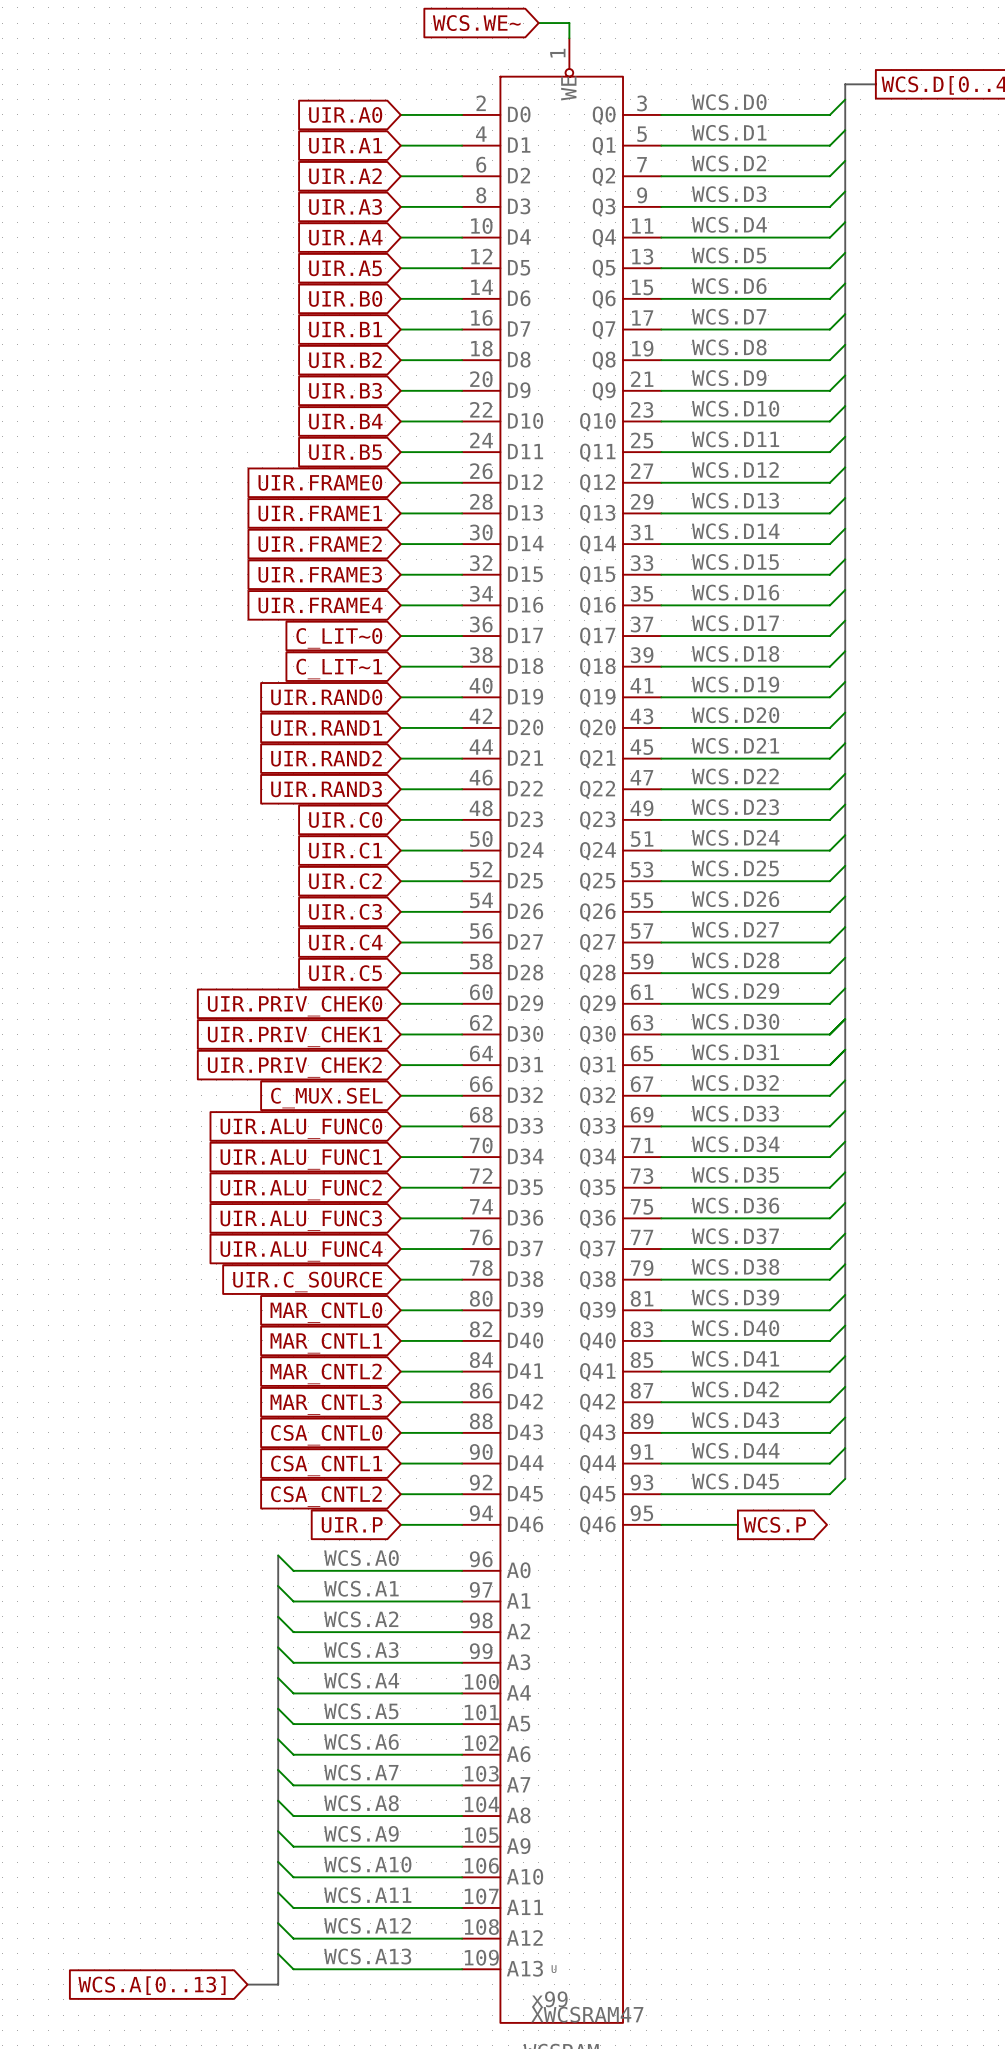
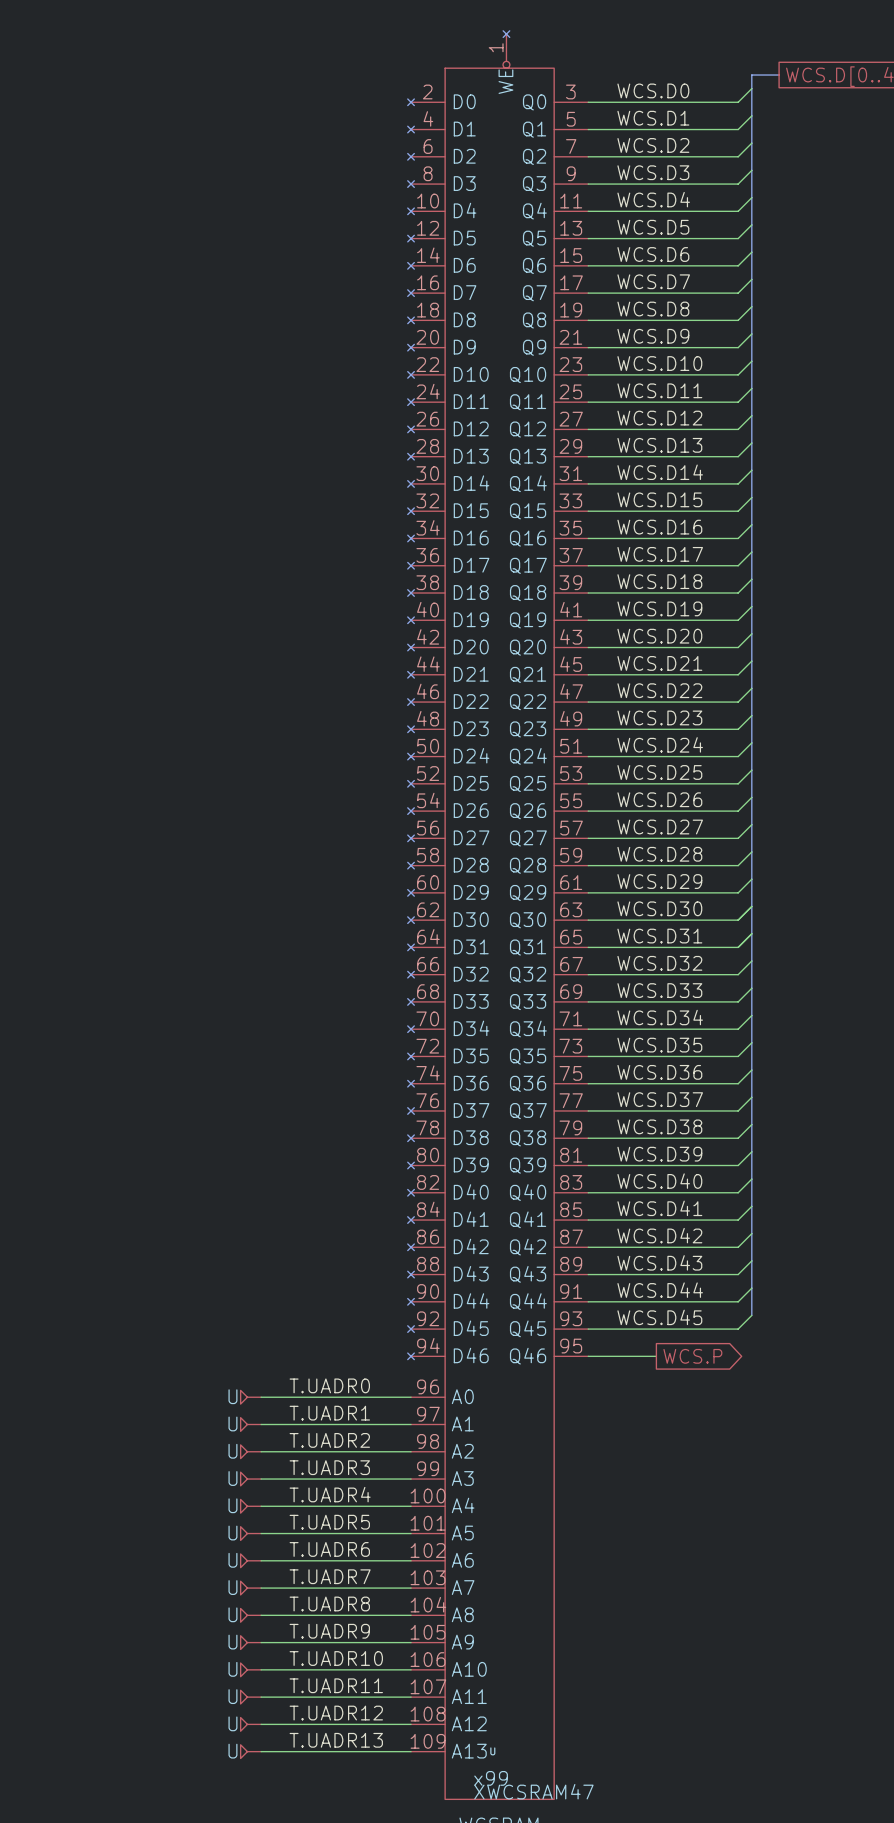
global label: WCS.WE~ (476, 23) -> none
wire: (538, 23) (569, 23) (569, 38) -> none
no-connect mark: none -> (506, 34)
global label: UIR.A0 (345, 114) -> none
wire: (400, 114) (462, 114) -> none
no-connect mark: none -> (411, 102)
global label: UIR.A1 (345, 145) -> none
wire: (400, 145) (462, 145) -> none
no-connect mark: none -> (411, 129)
global label: UIR.A2 (345, 176) -> none
wire: (400, 176) (462, 176) -> none
no-connect mark: none -> (411, 156)
global label: UIR.A3 (345, 206) -> none
wire: (400, 206) (462, 206) -> none
no-connect mark: none -> (411, 184)
global label: UIR.A4 (345, 237) -> none
wire: (400, 237) (462, 237) -> none
no-connect mark: none -> (411, 211)
global label: UIR.A5 (345, 268) -> none
wire: (400, 268) (462, 268) -> none
no-connect mark: none -> (411, 238)
global label: UIR.B0 (345, 298) -> none
wire: (400, 298) (462, 298) -> none
no-connect mark: none -> (411, 265)
global label: UIR.B1 (345, 329) -> none
wire: (400, 329) (462, 329) -> none
no-connect mark: none -> (411, 293)
global label: UIR.B2 (345, 360) -> none
wire: (400, 360) (462, 360) -> none
no-connect mark: none -> (411, 320)
global label: UIR.B3 (345, 390) -> none
wire: (400, 390) (462, 390) -> none
no-connect mark: none -> (411, 347)
global label: UIR.B4 (345, 421) -> none
wire: (400, 421) (462, 421) -> none
no-connect mark: none -> (411, 374)
global label: UIR.B5 (345, 452) -> none
wire: (400, 452) (462, 452) -> none
no-connect mark: none -> (411, 402)
global label: UIR.FRAME0 (320, 482) -> none
wire: (400, 482) (462, 482) -> none
no-connect mark: none -> (411, 429)
global label: UIR.FRAME1 (320, 513) -> none
wire: (400, 513) (462, 513) -> none
no-connect mark: none -> (411, 456)
global label: UIR.FRAME2 (320, 544) -> none
wire: (400, 544) (462, 544) -> none
no-connect mark: none -> (411, 483)
global label: UIR.FRAME3 (320, 574) -> none
wire: (400, 574) (462, 574) -> none
no-connect mark: none -> (411, 511)
global label: UIR.FRAME4 (320, 605) -> none
wire: (400, 605) (462, 605) -> none
no-connect mark: none -> (411, 538)
wire: (400, 636) (462, 636) -> none
no-connect mark: none -> (411, 565)
global label: C_LIT~0 (339, 638) -> none
wire: (400, 666) (462, 666) -> none
no-connect mark: none -> (411, 592)
global label: C_LIT~1 (339, 669) -> none
global label: UIR.RAND0 (326, 697) -> none
wire: (400, 697) (462, 697) -> none
no-connect mark: none -> (411, 620)
wire: (400, 727) (462, 727) -> none
no-connect mark: none -> (411, 647)
global label: UIR.RAND1 (326, 728) -> none
global label: UIR.RAND2 (326, 758) -> none
wire: (400, 758) (462, 758) -> none
no-connect mark: none -> (411, 674)
global label: UIR.RAND3 (326, 789) -> none
wire: (400, 789) (462, 789) -> none
no-connect mark: none -> (411, 702)
global label: UIR.C0 (345, 819) -> none
wire: (400, 819) (462, 819) -> none
no-connect mark: none -> (411, 729)
global label: UIR.C1 (345, 850) -> none
wire: (400, 850) (462, 850) -> none
no-connect mark: none -> (411, 756)
global label: UIR.C2 (345, 881) -> none
wire: (400, 881) (462, 881) -> none
no-connect mark: none -> (411, 783)
global label: UIR.C3 (345, 911) -> none
wire: (400, 911) (462, 911) -> none
no-connect mark: none -> (411, 811)
global label: UIR.C4 (345, 942) -> none
wire: (400, 942) (462, 942) -> none
no-connect mark: none -> (411, 838)
global label: UIR.C5 (345, 973) -> none
wire: (400, 973) (462, 973) -> none
no-connect mark: none -> (411, 865)
wire: (400, 1003) (462, 1003) -> none
no-connect mark: none -> (411, 892)
global label: UIR.PRIV_CHEK0 (295, 1006) -> none
wire: (400, 1034) (462, 1034) -> none
no-connect mark: none -> (411, 920)
global label: UIR.PRIV_CHEK1 (295, 1036) -> none
wire: (400, 1065) (462, 1065) -> none
no-connect mark: none -> (411, 947)
global label: UIR.PRIV_CHEK2 (294, 1067) -> none
wire: (400, 1095) (462, 1095) -> none
no-connect mark: none -> (411, 974)
global label: C_MUX.SEL (326, 1098) -> none
wire: (400, 1126) (462, 1126) -> none
no-connect mark: none -> (411, 1001)
global label: UIR.ALU_FUNC0 (301, 1128) -> none
wire: (400, 1157) (462, 1157) -> none
no-connect mark: none -> (411, 1029)
global label: UIR.ALU_FUNC1 (301, 1159) -> none
wire: (400, 1187) (462, 1187) -> none
no-connect mark: none -> (411, 1056)
global label: UIR.ALU_FUNC2 (301, 1190) -> none
wire: (400, 1218) (462, 1218) -> none
no-connect mark: none -> (411, 1083)
global label: UIR.ALU_FUNC3 (301, 1220) -> none
wire: (400, 1249) (462, 1249) -> none
no-connect mark: none -> (411, 1110)
global label: UIR.ALU_FUNC4 (301, 1251) -> none
wire: (400, 1279) (462, 1279) -> none
no-connect mark: none -> (411, 1138)
global label: UIR.C_SOURCE (307, 1282) -> none
wire: (400, 1310) (462, 1310) -> none
no-connect mark: none -> (411, 1165)
global label: MAR_CNTL0 (326, 1312) -> none
wire: (400, 1340) (462, 1340) -> none
no-connect mark: none -> (411, 1192)
global label: MAR_CNTL1 (326, 1343) -> none
wire: (400, 1371) (462, 1371) -> none
no-connect mark: none -> (411, 1220)
global label: MAR_CNTL2 (326, 1373) -> none
wire: (400, 1402) (462, 1402) -> none
no-connect mark: none -> (411, 1247)
global label: MAR_CNTL3 (326, 1404) -> none
wire: (400, 1432) (462, 1432) -> none
no-connect mark: none -> (411, 1274)
global label: CSA_CNTL0 (326, 1435) -> none
wire: (400, 1463) (462, 1463) -> none
no-connect mark: none -> (411, 1301)
global label: CSA_CNTL1 (326, 1465) -> none
wire: (400, 1494) (462, 1494) -> none
no-connect mark: none -> (411, 1329)
global label: CSA_CNTL2 (326, 1496) -> none
wire: (400, 1524) (462, 1524) -> none
no-connect mark: none -> (411, 1356)
global label: UIR.P (352, 1525) -> none
wire: (278, 1555) (293, 1570) -> none
bus: (278, 1555) (278, 1984) (247, 1984) -> none
label: WCS.A0 (361, 1558) -> T.UADR0 (329, 1385)
U: none -> (250, 1397)
wire: (278, 1586) (293, 1601) -> none
label: WCS.A1 (361, 1588) -> T.UADR1 (329, 1413)
U: none -> (250, 1424)
wire: (278, 1616) (293, 1632) -> none
label: WCS.A2 (361, 1619) -> T.UADR2 (329, 1440)
U: none -> (250, 1451)
wire: (278, 1647) (293, 1662) -> none
label: WCS.A3 (361, 1650) -> T.UADR3 (329, 1467)
U: none -> (250, 1479)
wire: (278, 1678) (293, 1693) -> none
label: WCS.A4 (361, 1680) -> T.UADR4 (330, 1494)
U: none -> (250, 1506)
wire: (278, 1708) (293, 1724) -> none
label: WCS.A5 (361, 1711) -> T.UADR5 (329, 1522)
U: none -> (250, 1533)
wire: (278, 1739) (293, 1754) -> none
label: WCS.A6 (361, 1741) -> T.UADR6 (329, 1549)
U: none -> (250, 1560)
wire: (278, 1770) (293, 1785) -> none
label: WCS.A7 (361, 1772) -> T.UADR7 (330, 1576)
U: none -> (250, 1588)
wire: (278, 1800) (293, 1816) -> none
label: WCS.A8 (361, 1803) -> T.UADR8 (329, 1603)
U: none -> (250, 1615)
wire: (278, 1831) (293, 1846) -> none
label: WCS.A9 (361, 1833) -> T.UADR9 (329, 1631)
U: none -> (250, 1642)
wire: (278, 1862) (293, 1877) -> none
label: WCS.A10 (367, 1864) -> T.UADR10 (336, 1658)
U: none -> (250, 1669)
wire: (278, 1892) (293, 1907) -> none
label: WCS.A11 (367, 1895) -> T.UADR11 (336, 1685)
U: none -> (250, 1697)
wire: (278, 1923) (293, 1938) -> none
label: WCS.A12 (367, 1925) -> T.UADR12 (336, 1713)
U: none -> (250, 1724)
wire: (278, 1953) (293, 1969) -> none
label: WCS.A13 (367, 1956) -> T.UADR13 (336, 1740)
U: none -> (250, 1751)
global label: WCS.A[0..13] (152, 1985) -> none

